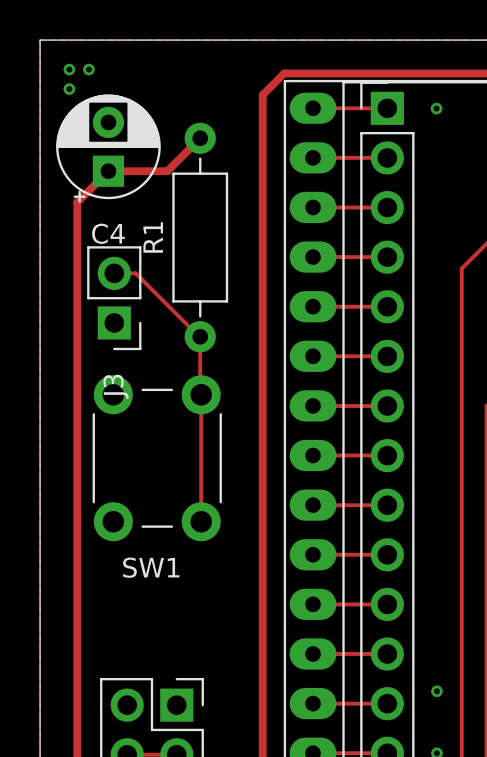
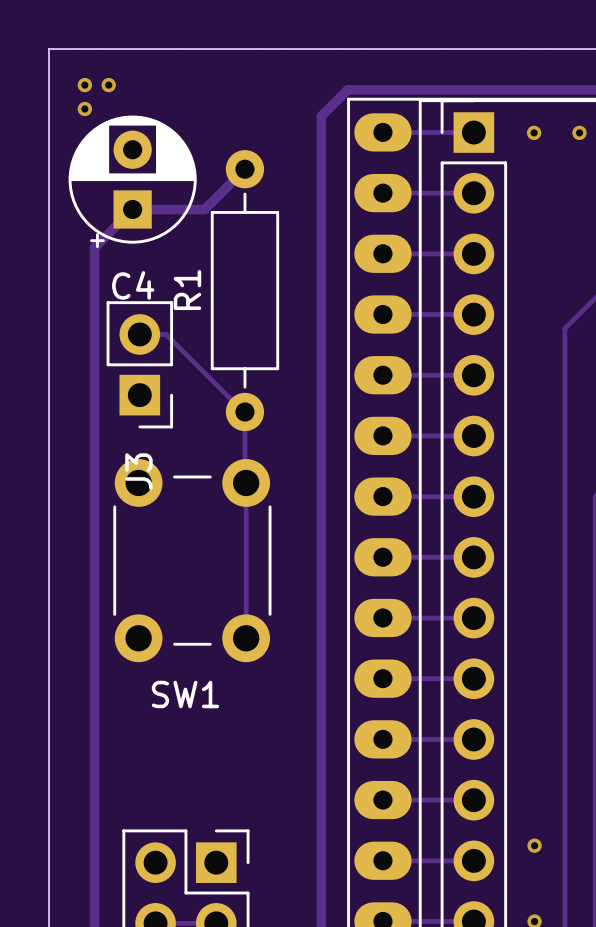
via: none -> (579, 132)

